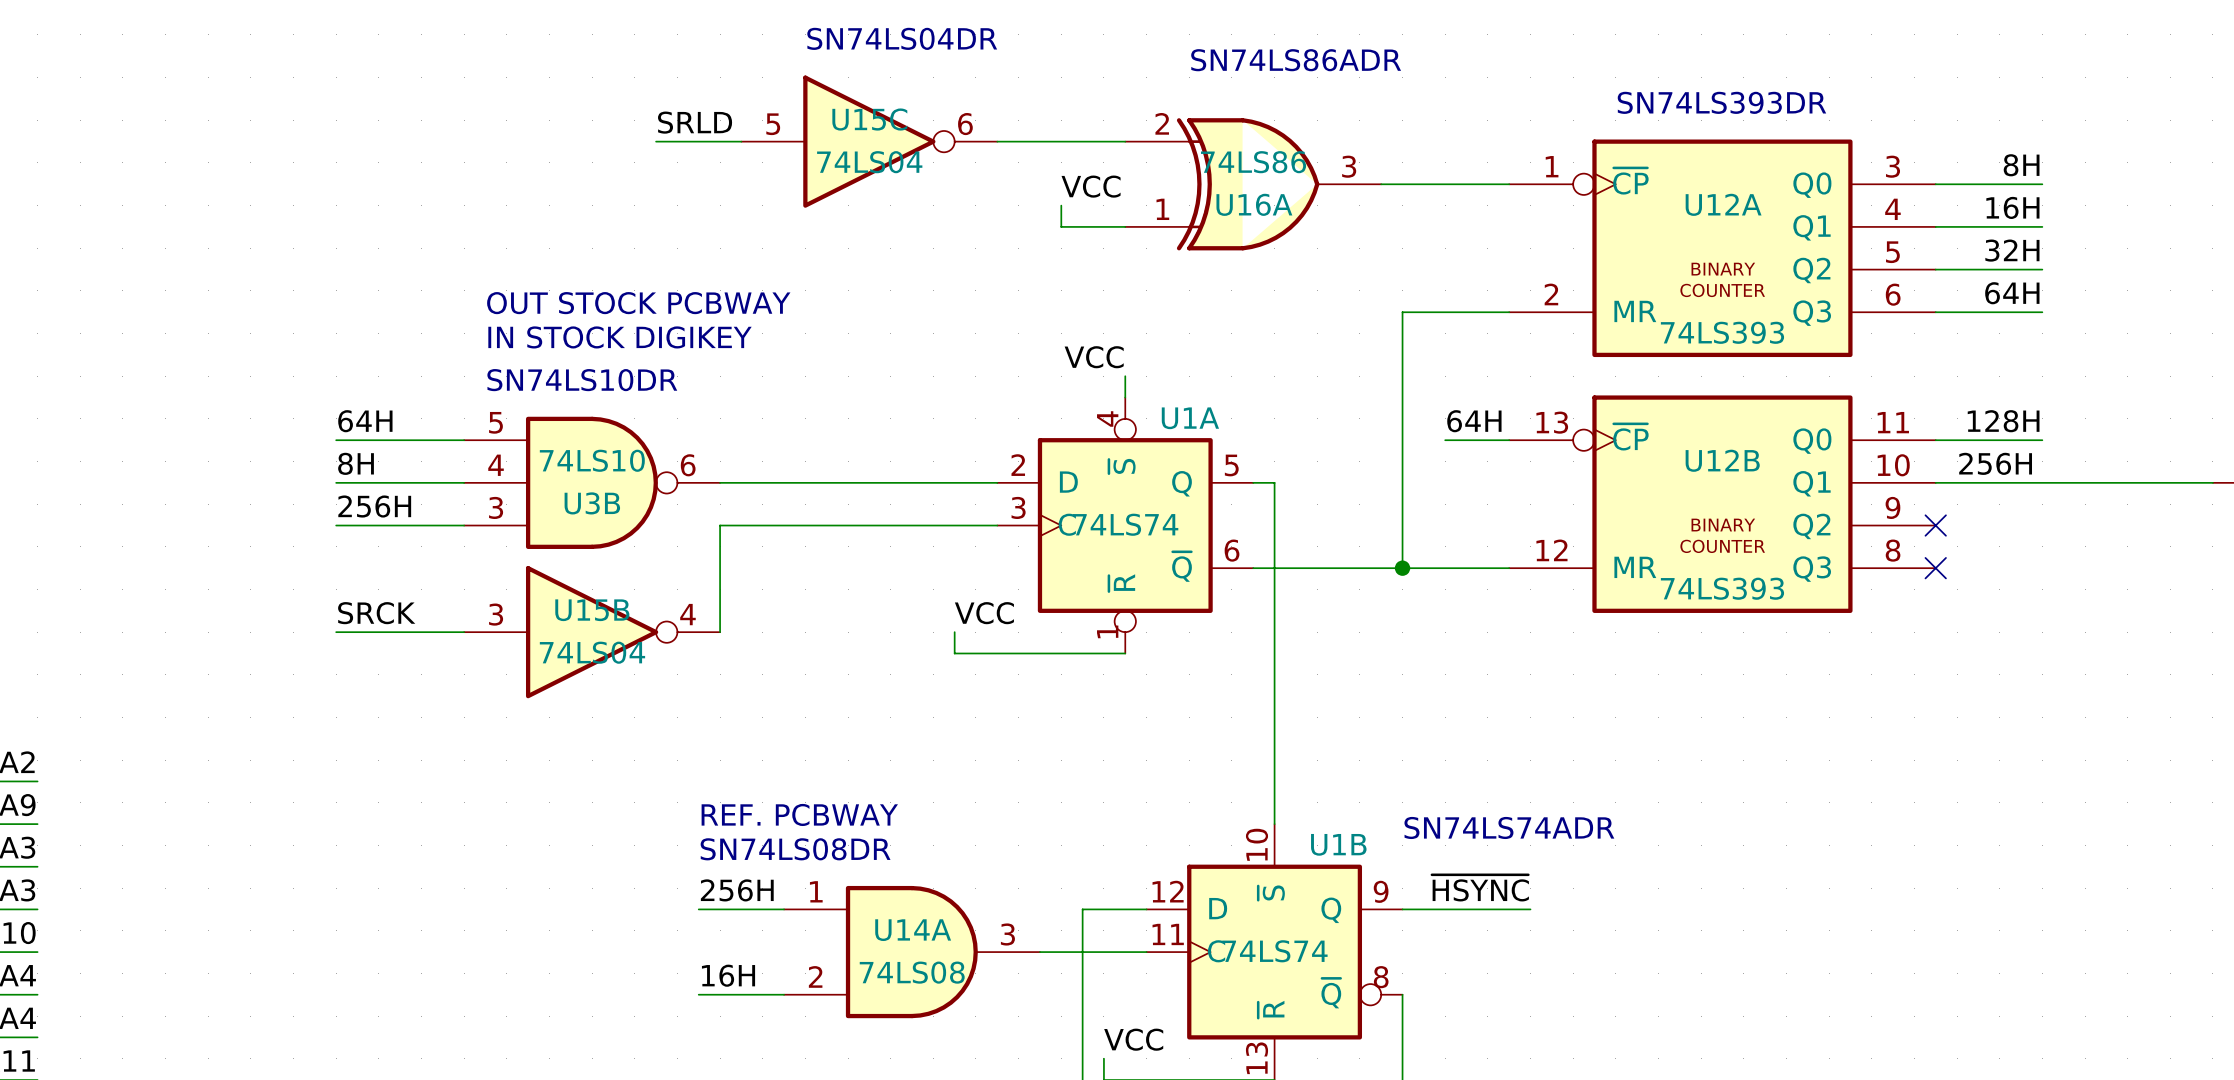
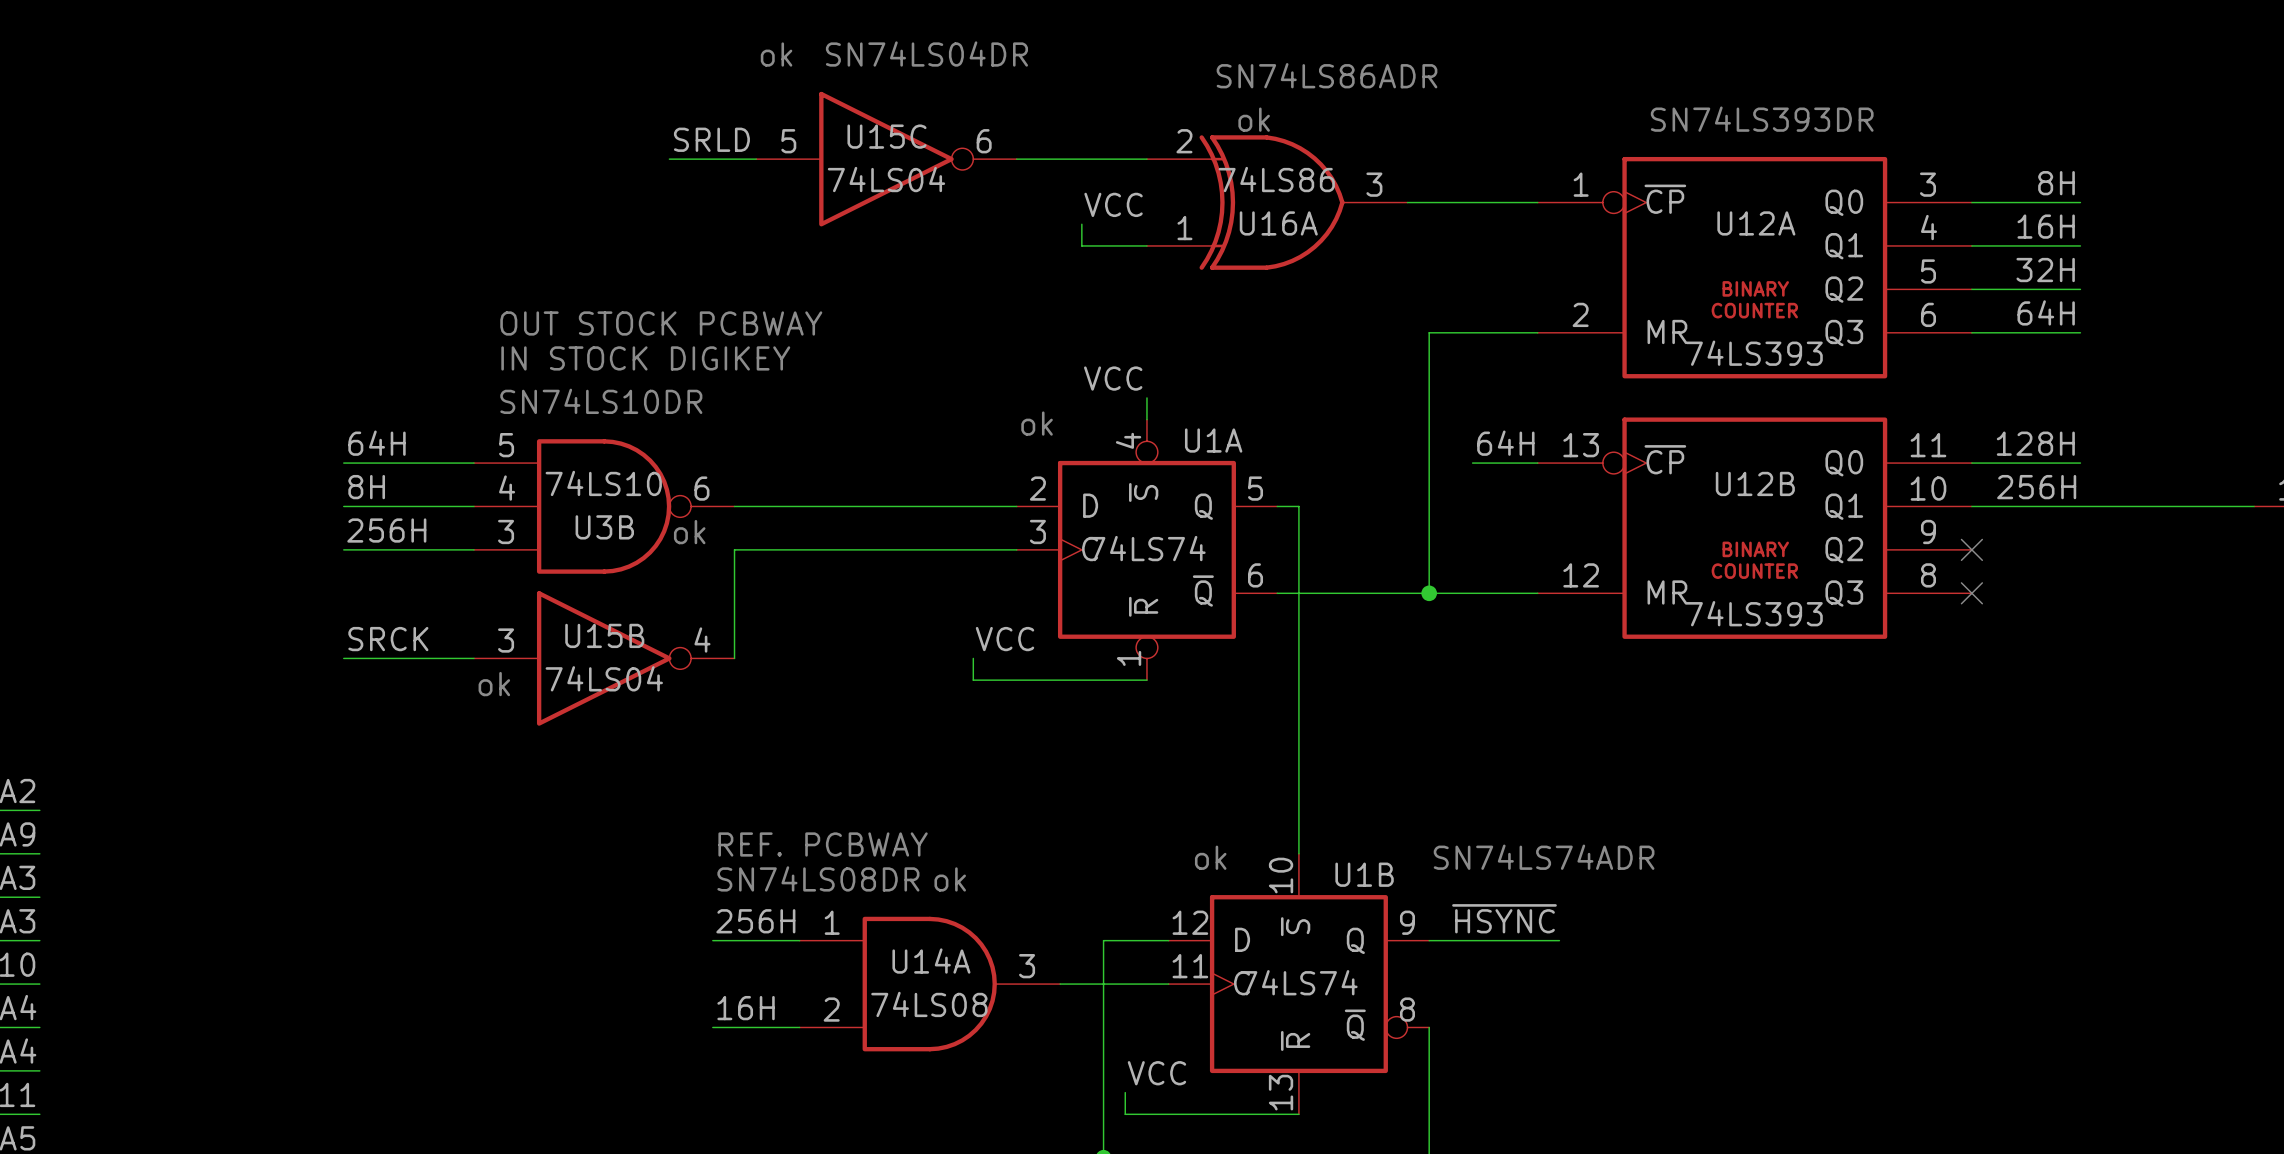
text: none -> ok (776, 54)
text: none -> ok (1254, 119)
text: none -> ok (1037, 423)
text: none -> ok (689, 532)
text: none -> ok (494, 684)
text: none -> ok (1210, 857)
text: none -> ok (950, 879)

